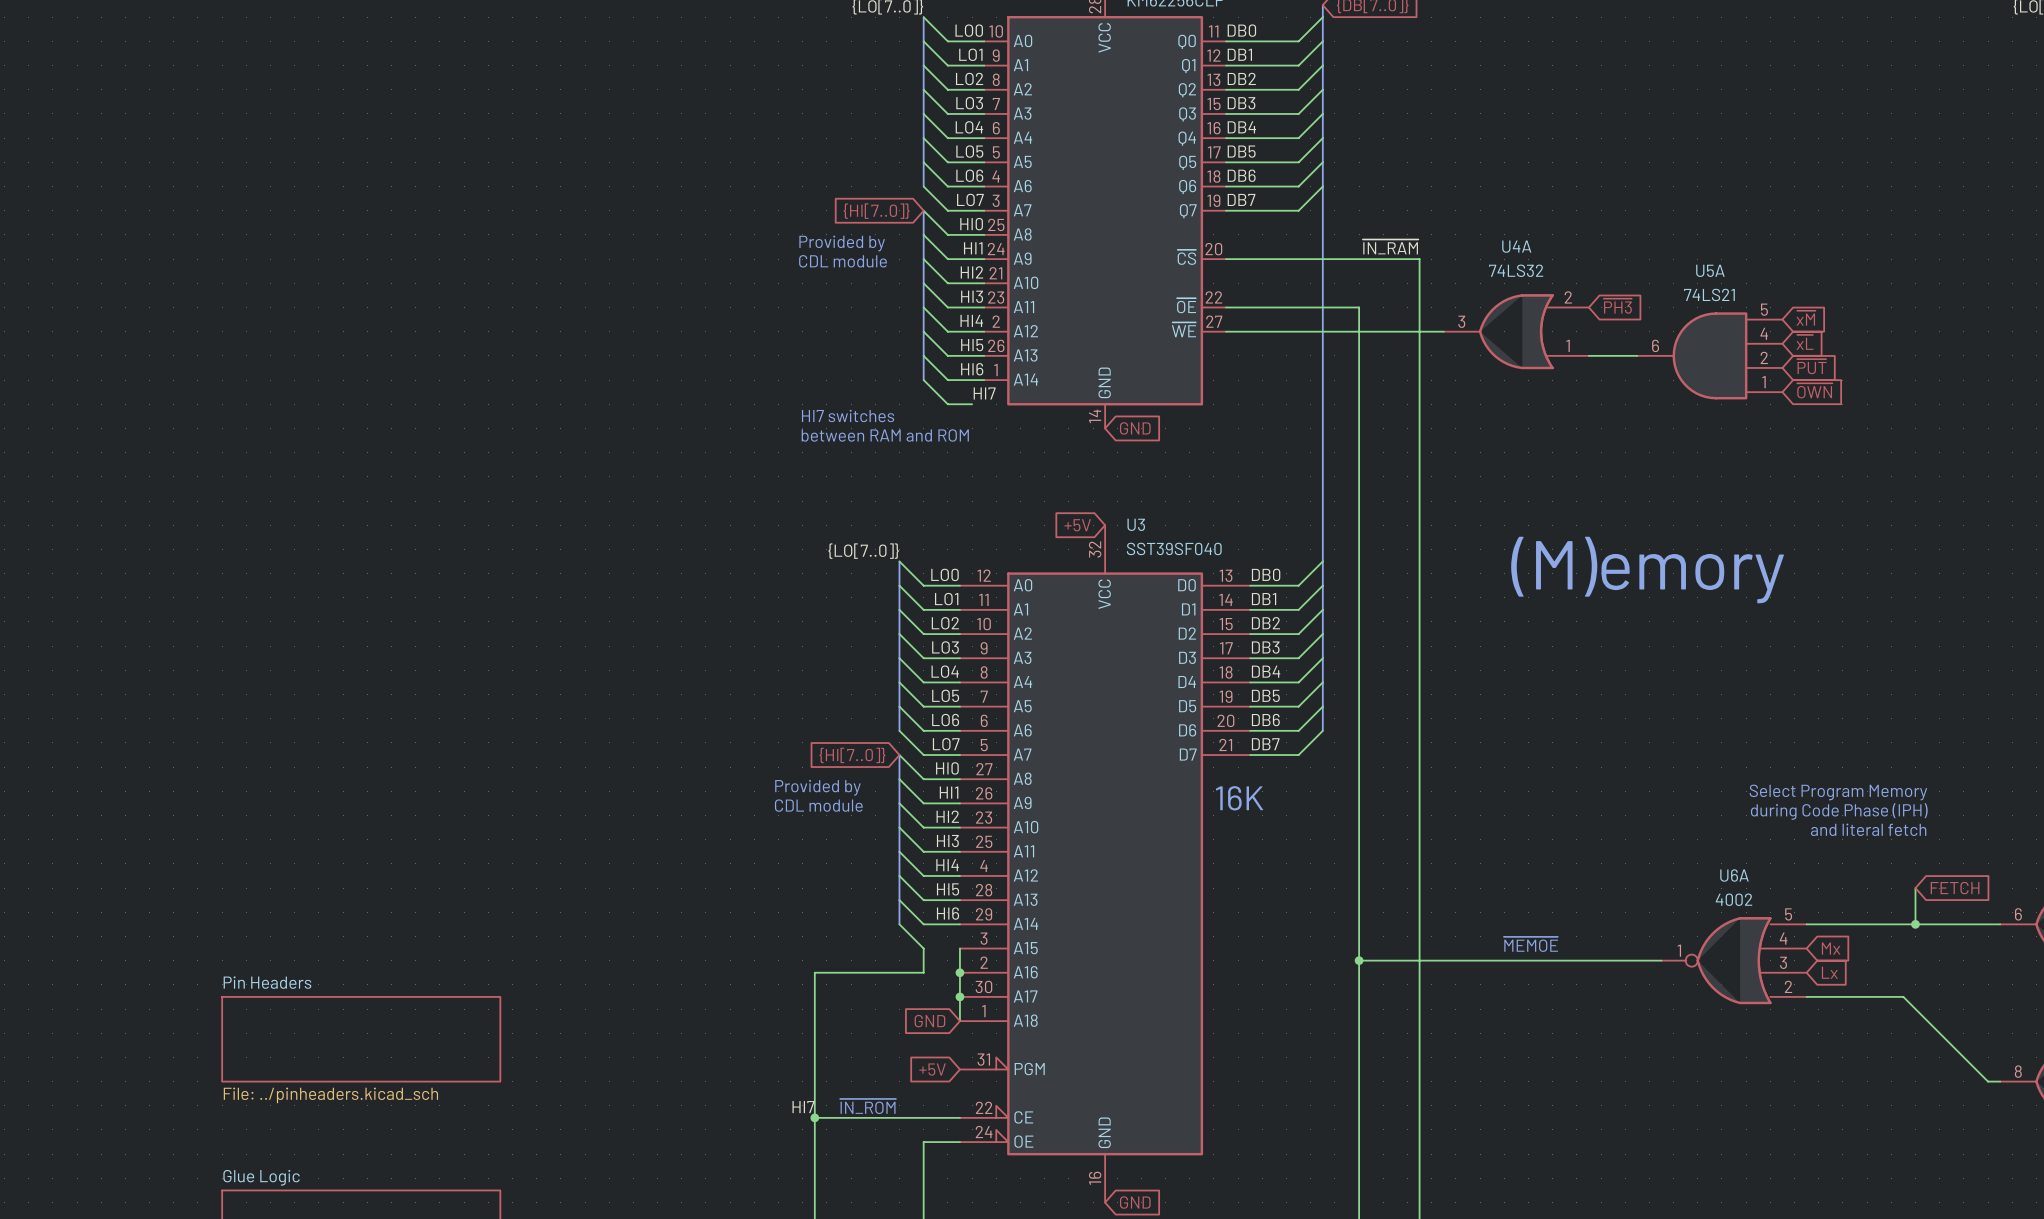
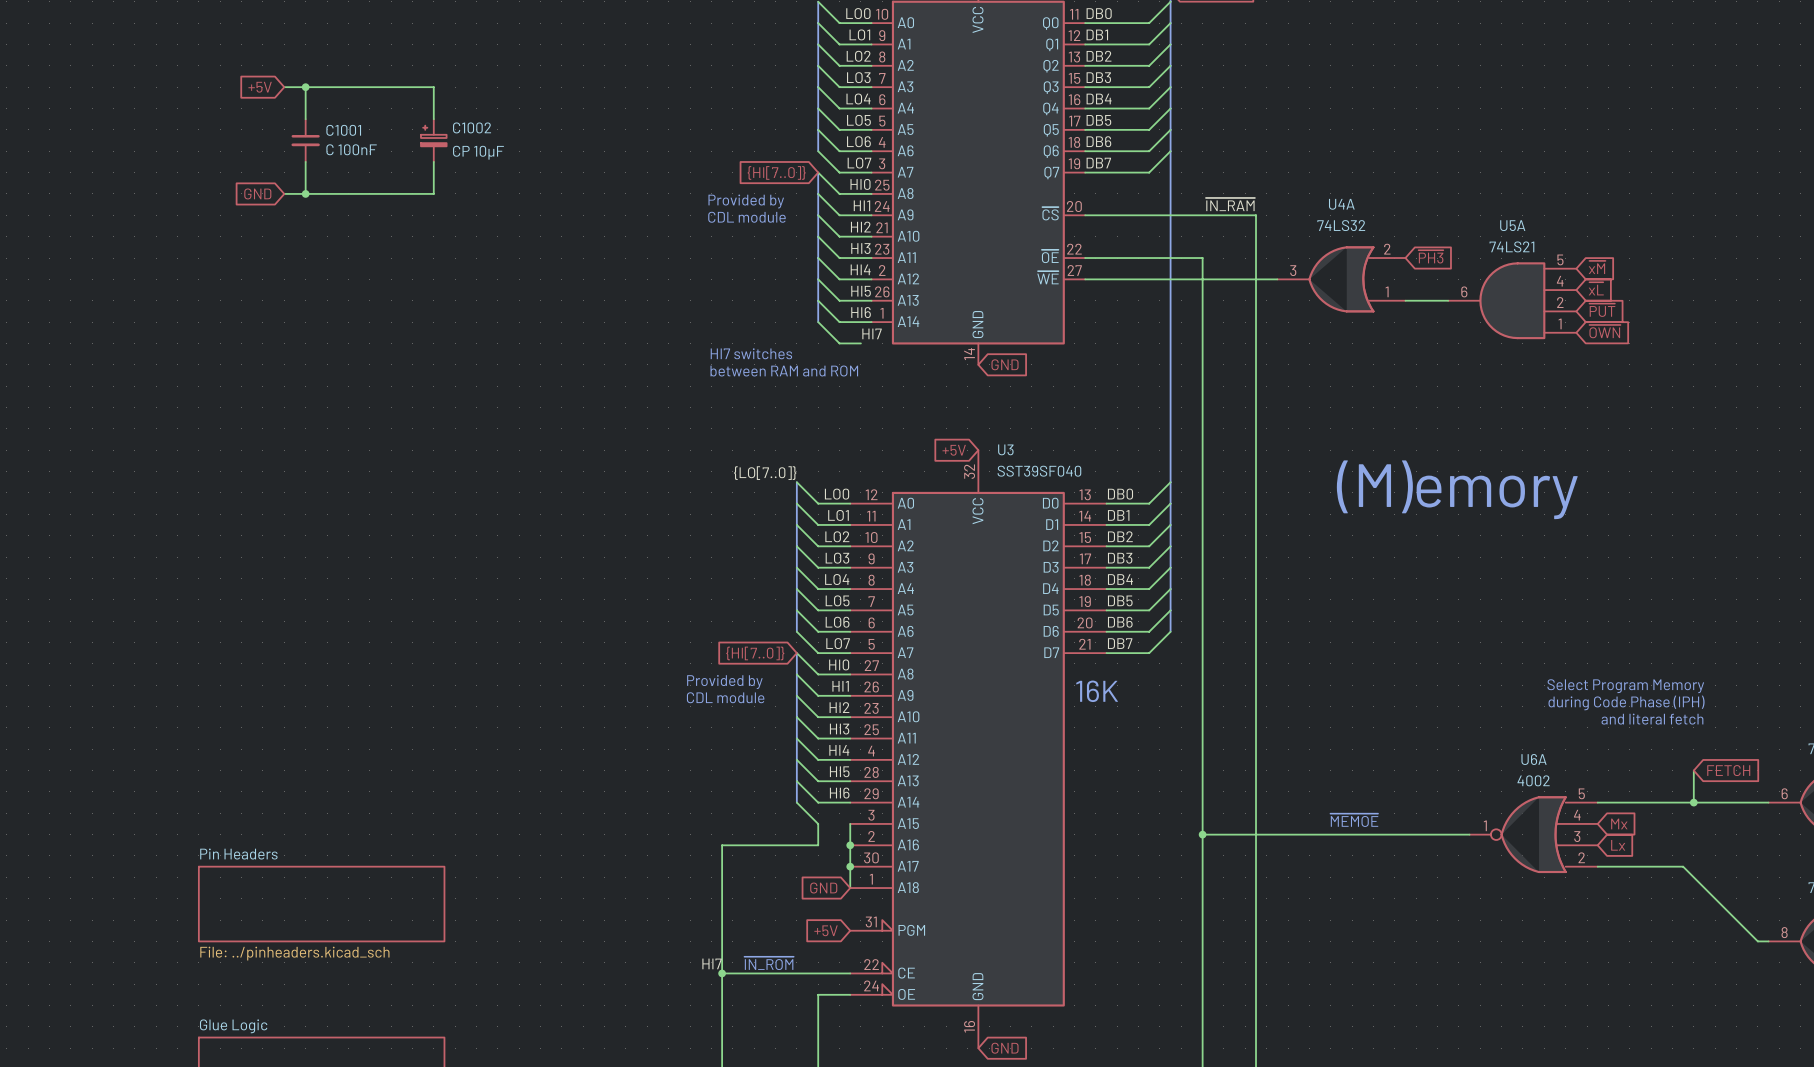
wire: none -> (284, 87) (433, 87) (433, 119)
wire: none -> (305, 87) (305, 119)
junction: none -> (305, 87)
global label: none -> +5V (260, 87)
C1001: none -> C 100nF (305, 140)
C1002: none -> CP 10μF (433, 140)
wire: none -> (305, 161) (305, 193)
wire: none -> (433, 161) (433, 193) (284, 193)
global label: none -> GND (257, 193)
junction: none -> (305, 193)

